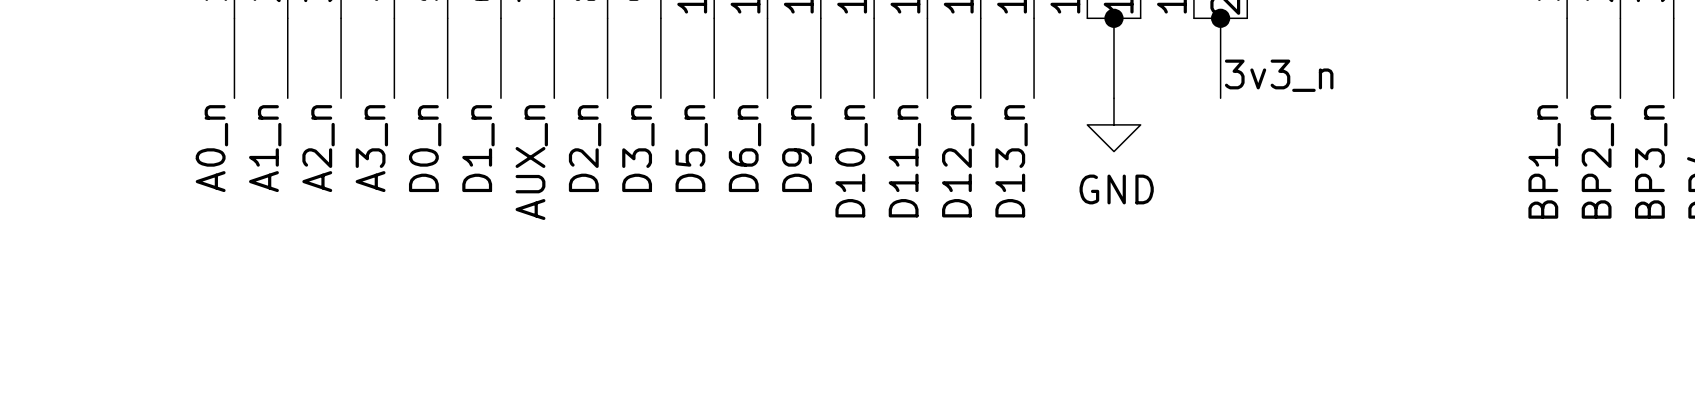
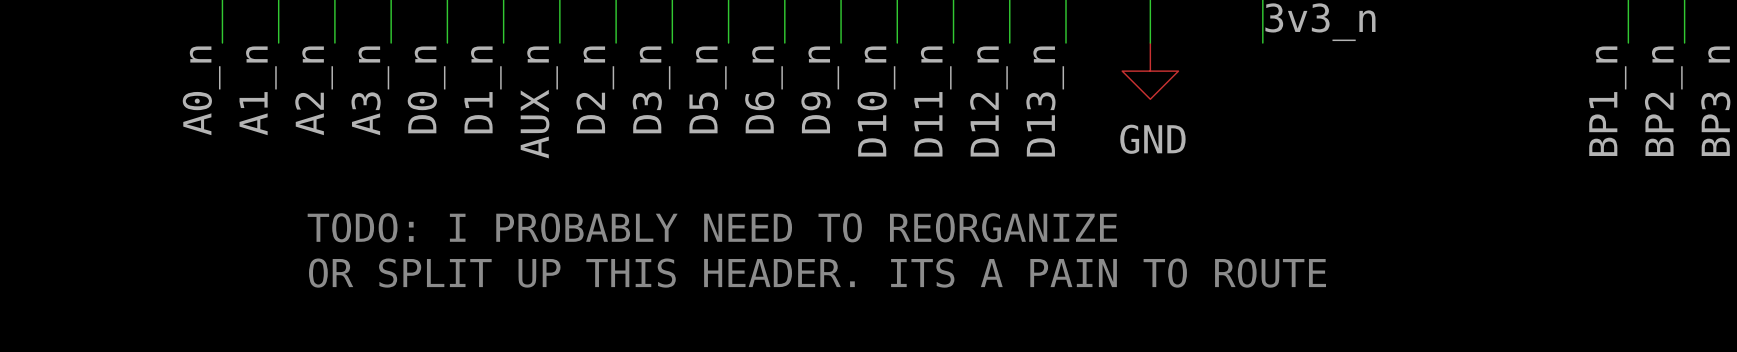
text: none -> TODO: I PROBABLY NEED TO REORGANIZE (712, 227)
text: none -> OR SPLIT UP THIS HEADER. ITS A PAIN TO ROUTE (817, 273)

